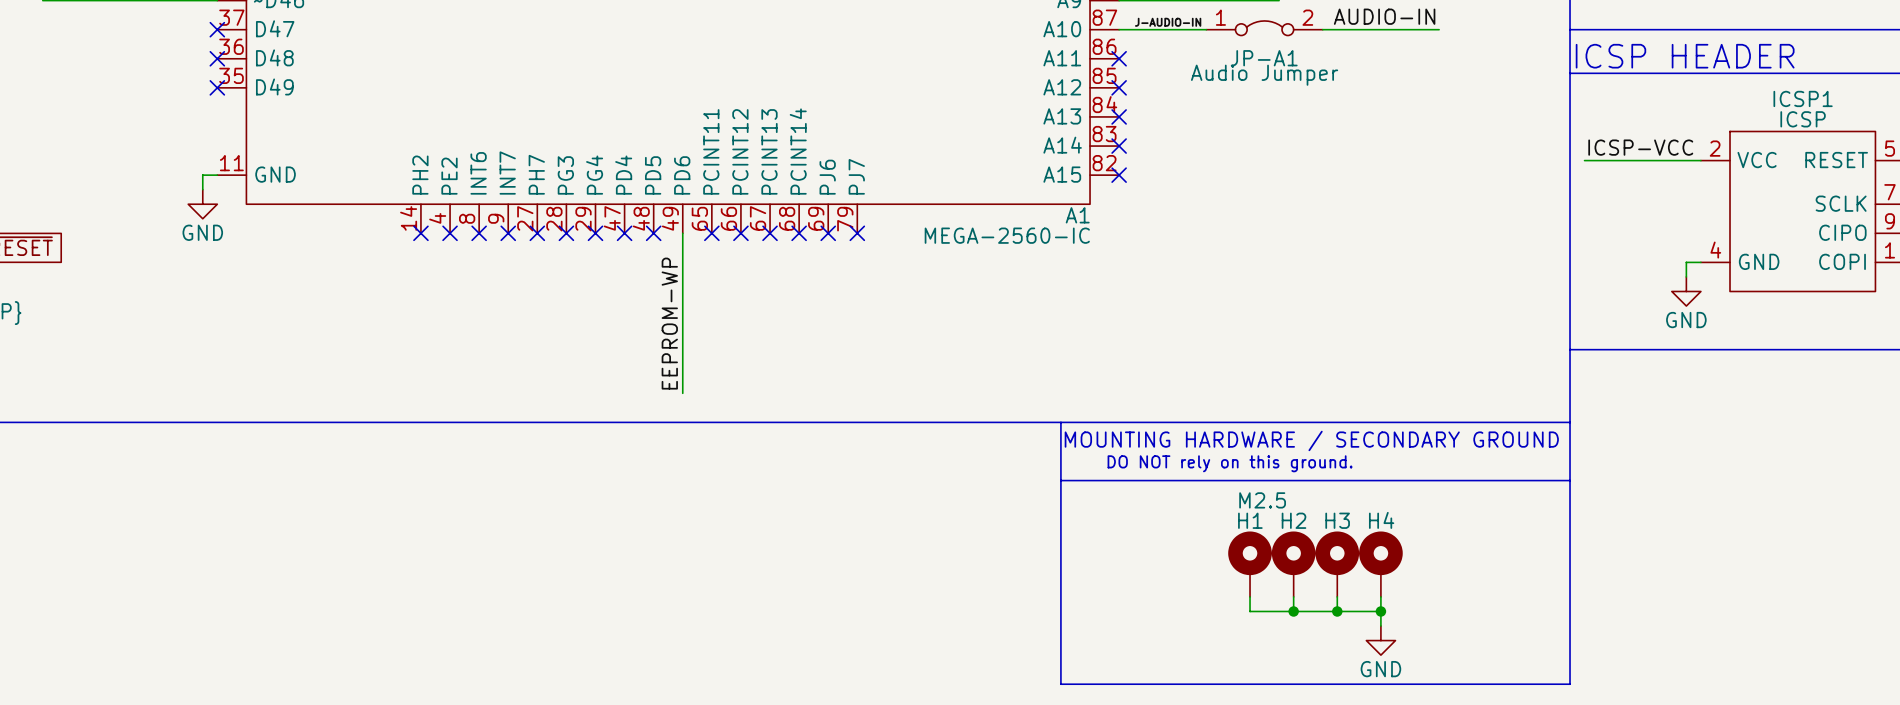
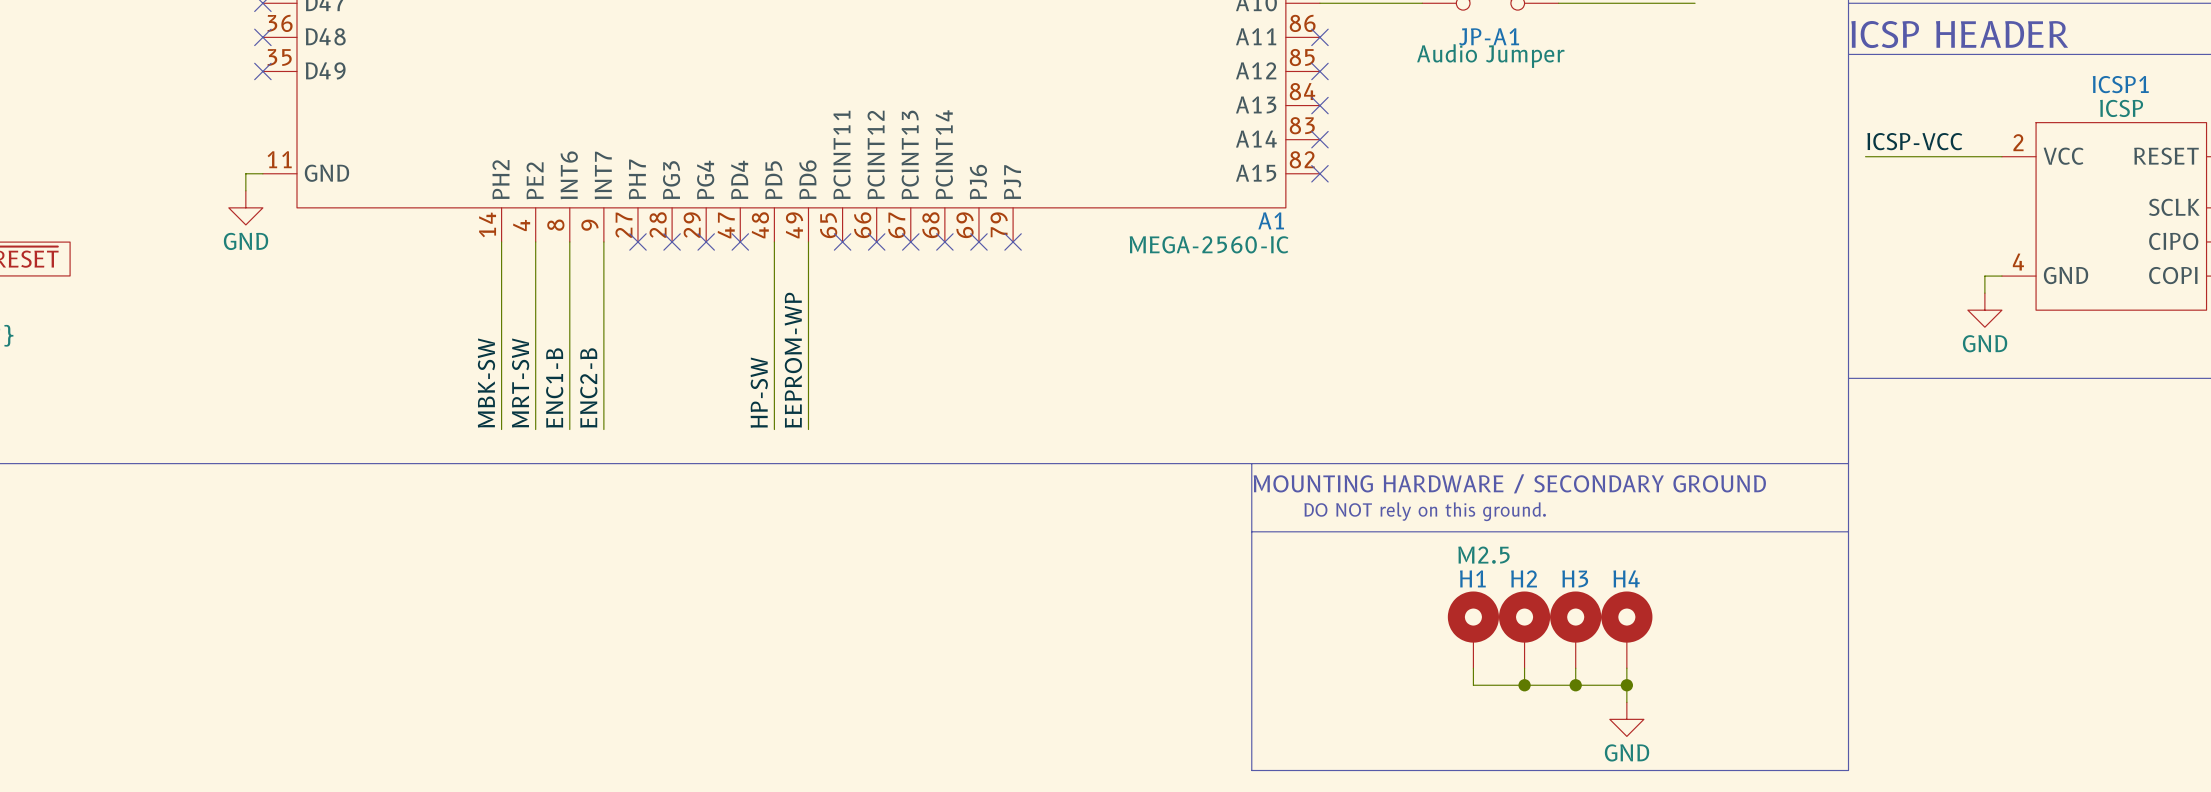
wire: none -> (501, 241) (501, 429)
no-connect mark: (420, 233) -> none
wire: none -> (535, 241) (535, 429)
no-connect mark: (450, 233) -> none
wire: none -> (569, 241) (569, 429)
no-connect mark: (479, 233) -> none
wire: none -> (603, 241) (603, 429)
no-connect mark: (508, 233) -> none
wire: none -> (774, 241) (774, 429)
no-connect mark: (653, 233) -> none
label: none -> MBK-SW (486, 383)
label: none -> MRT-SW (520, 383)
label: none -> ENC1-B (554, 388)
label: none -> ENC2-B (588, 388)
label: none -> HP-SW (759, 392)

